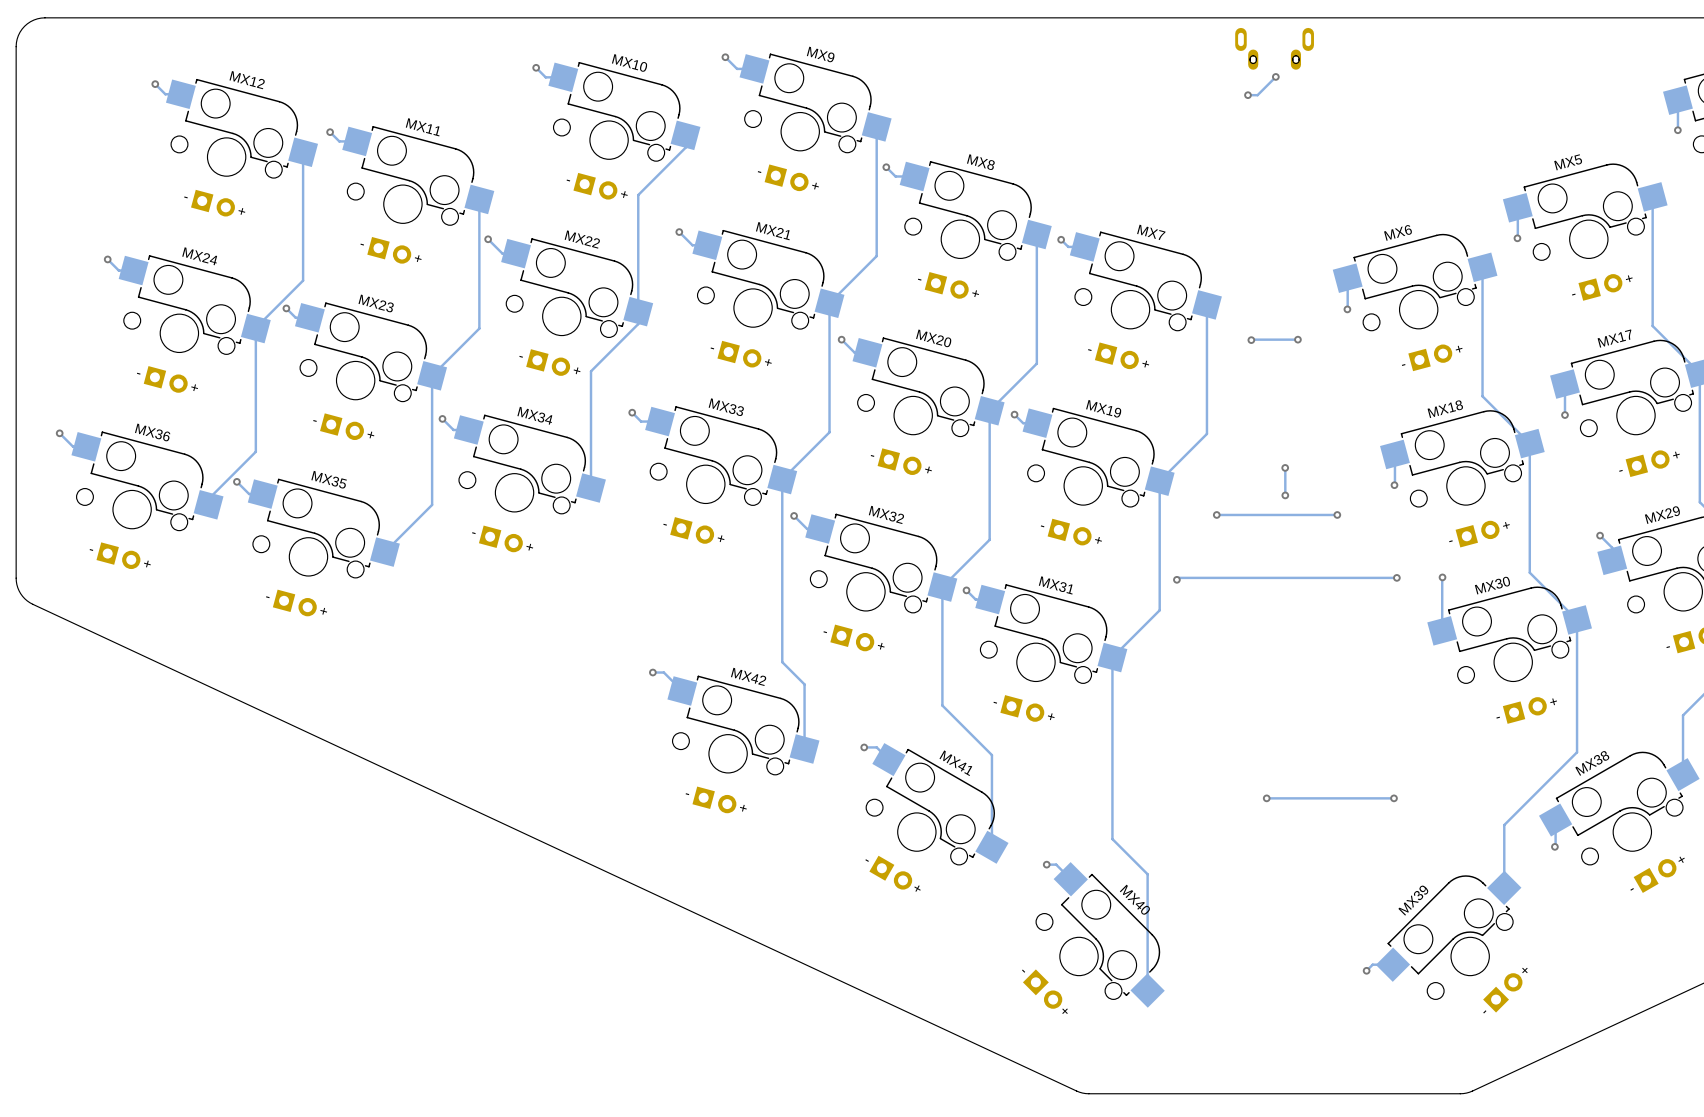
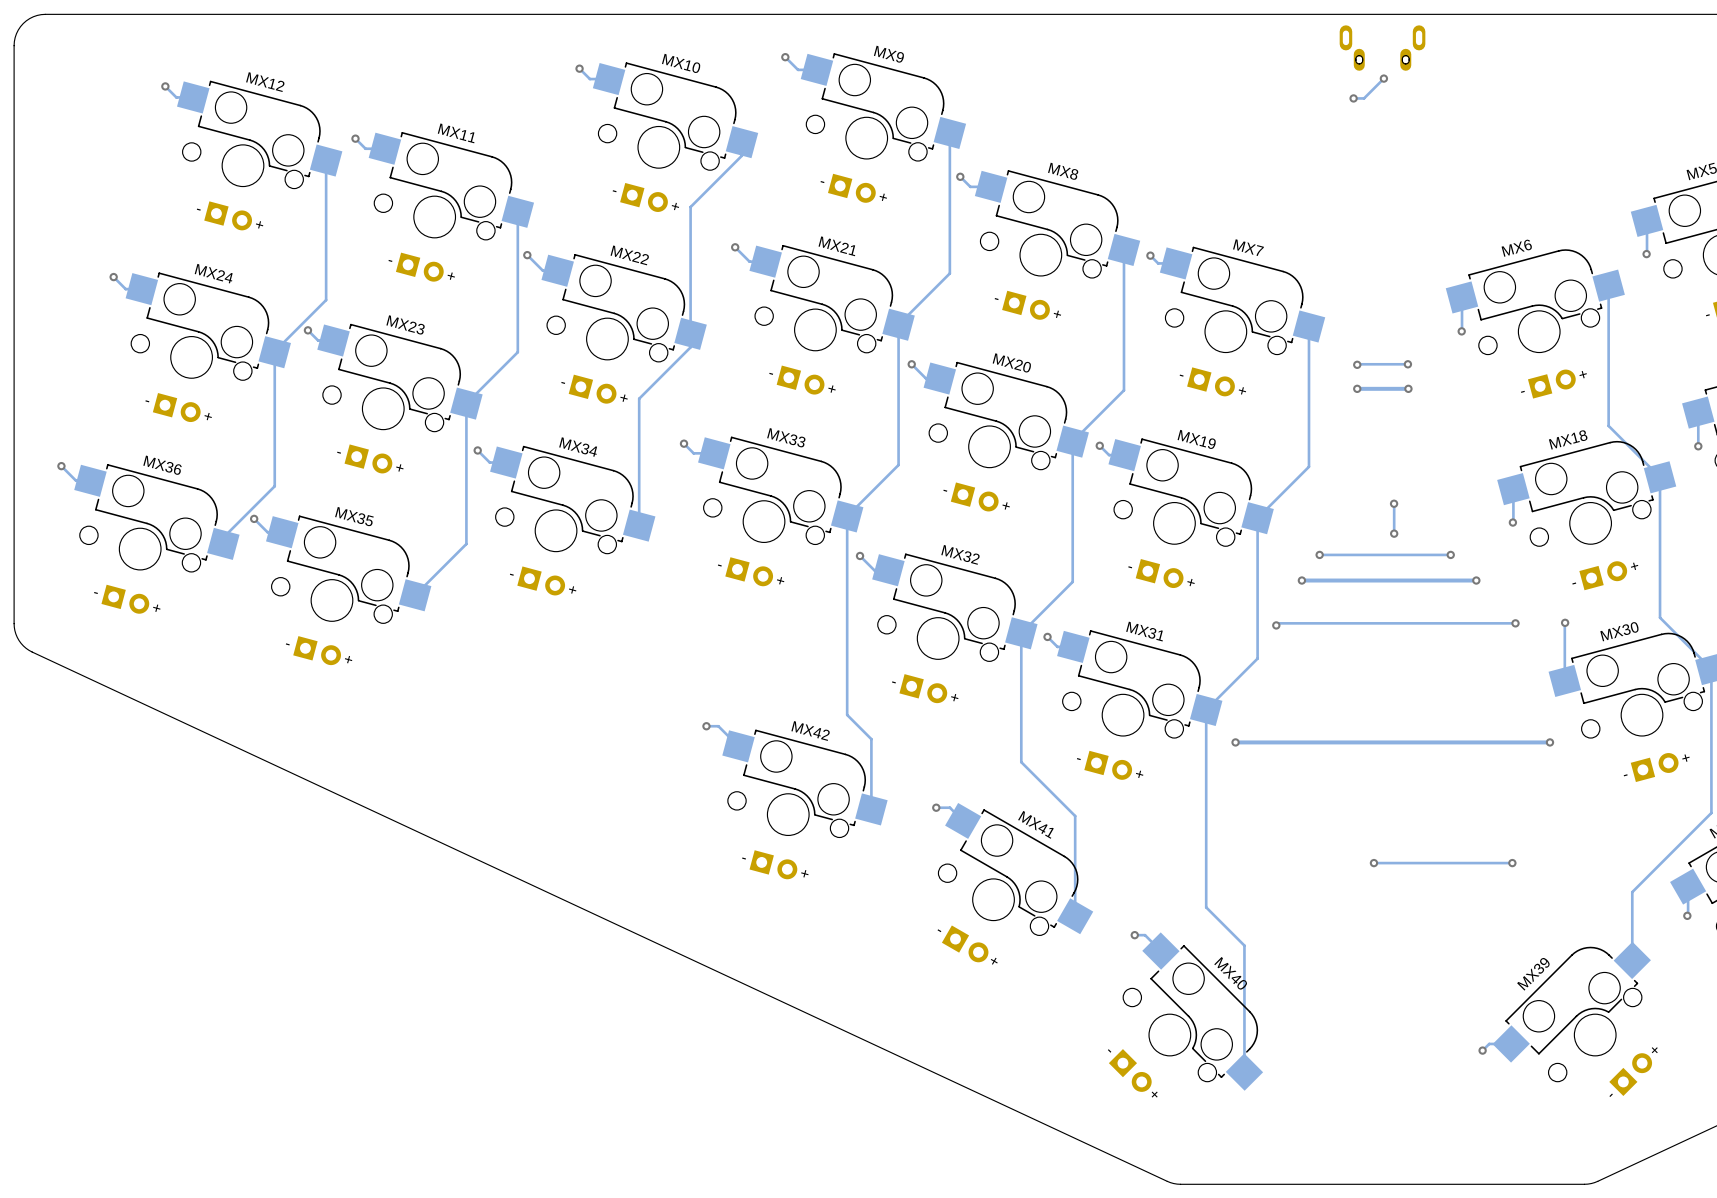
via: none -> (1357, 388)
track: none -> (1408, 388) (1357, 388)
via: none -> (1408, 388)
via: none -> (1301, 580)
track: none -> (1476, 580) (1301, 580)
via: none -> (1476, 580)
via: none -> (1235, 742)
track: none -> (1549, 742) (1235, 742)
via: none -> (1549, 742)

